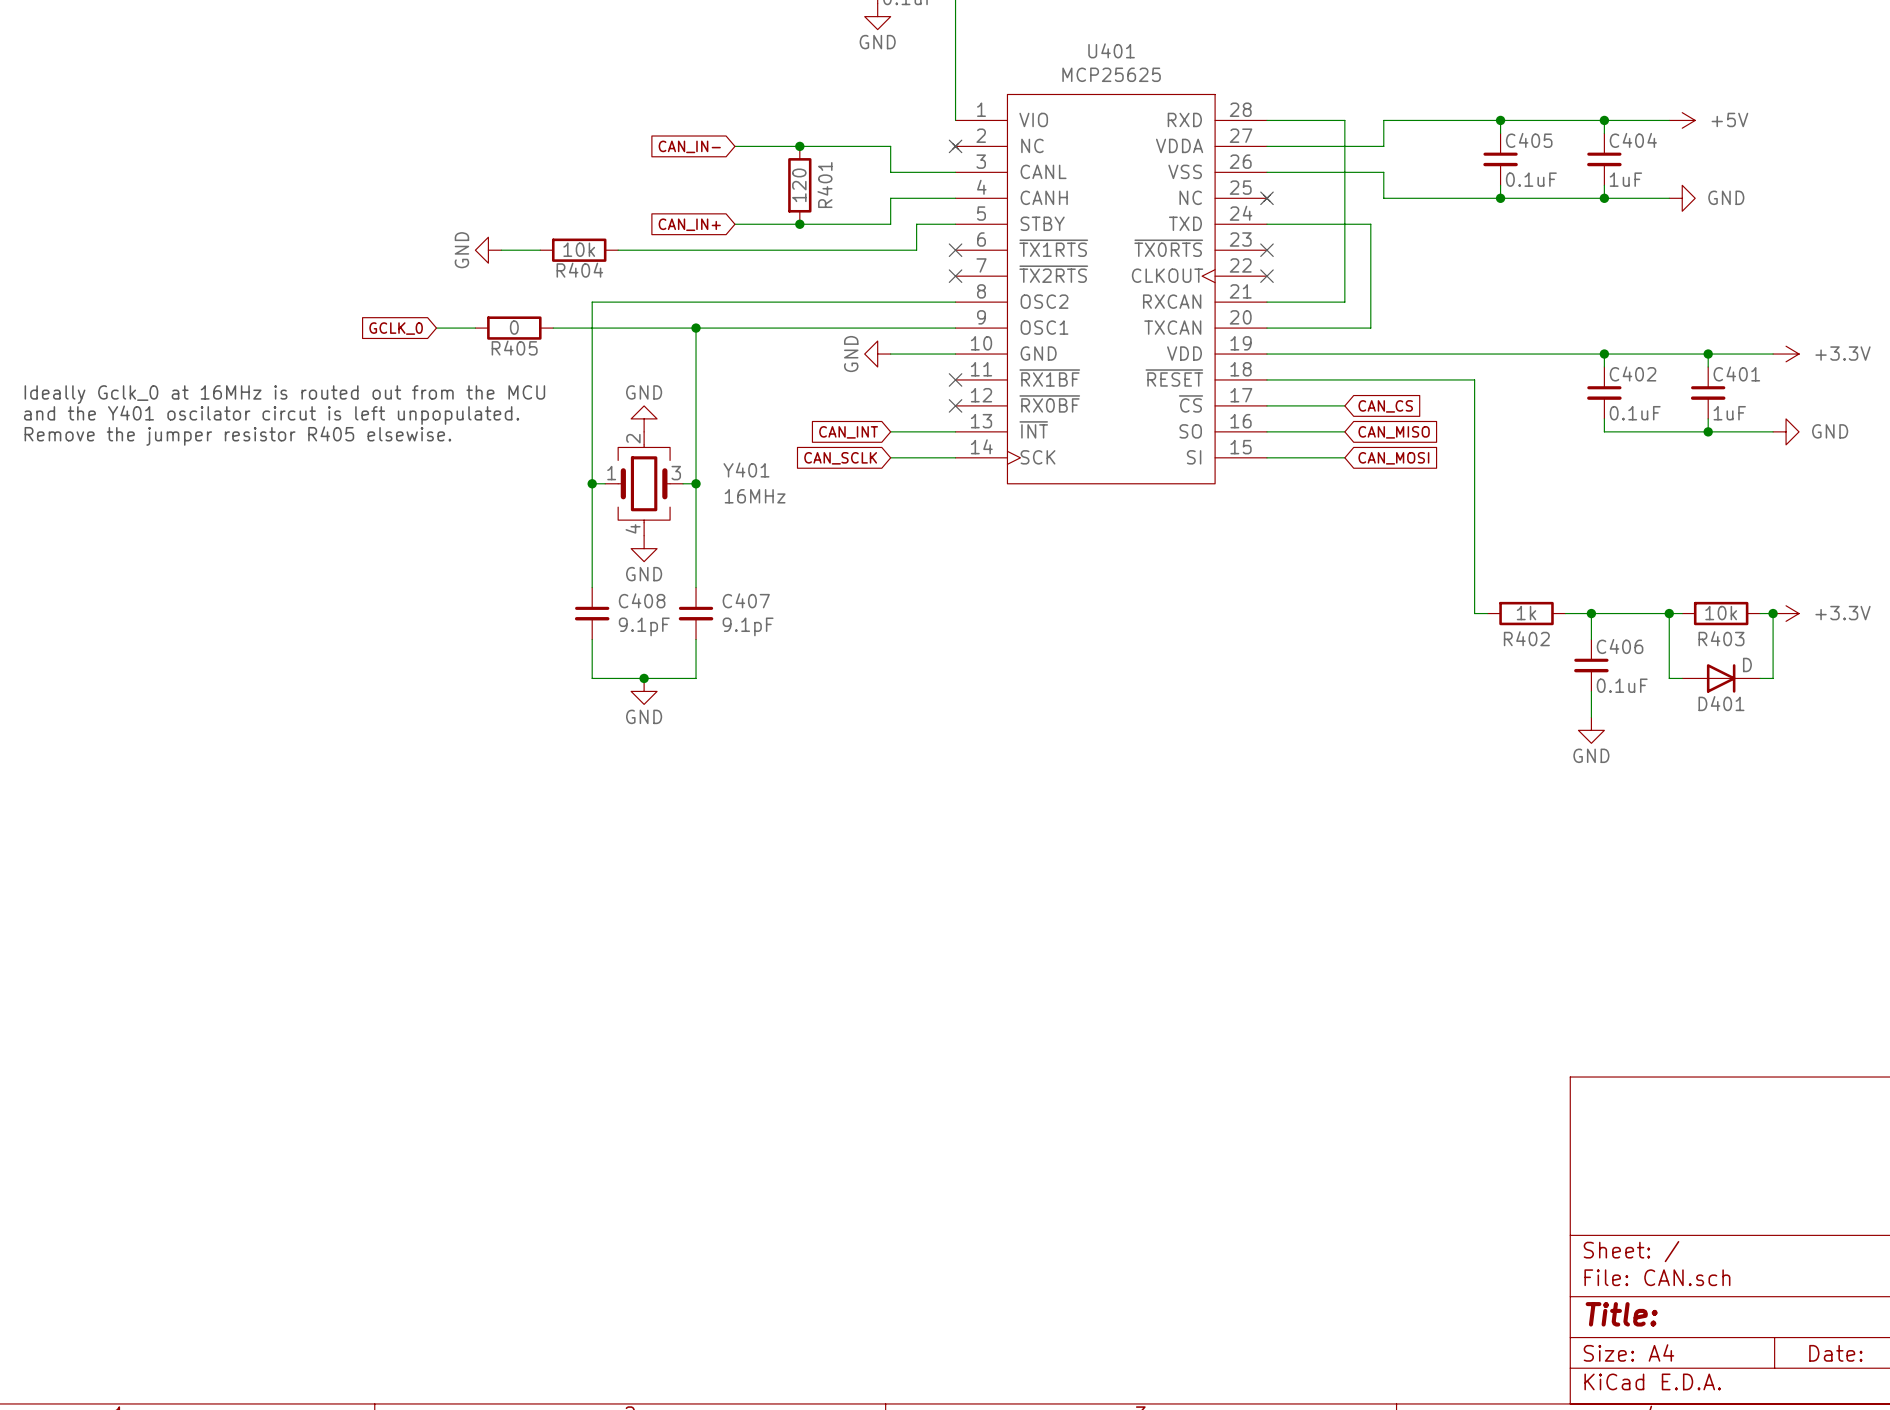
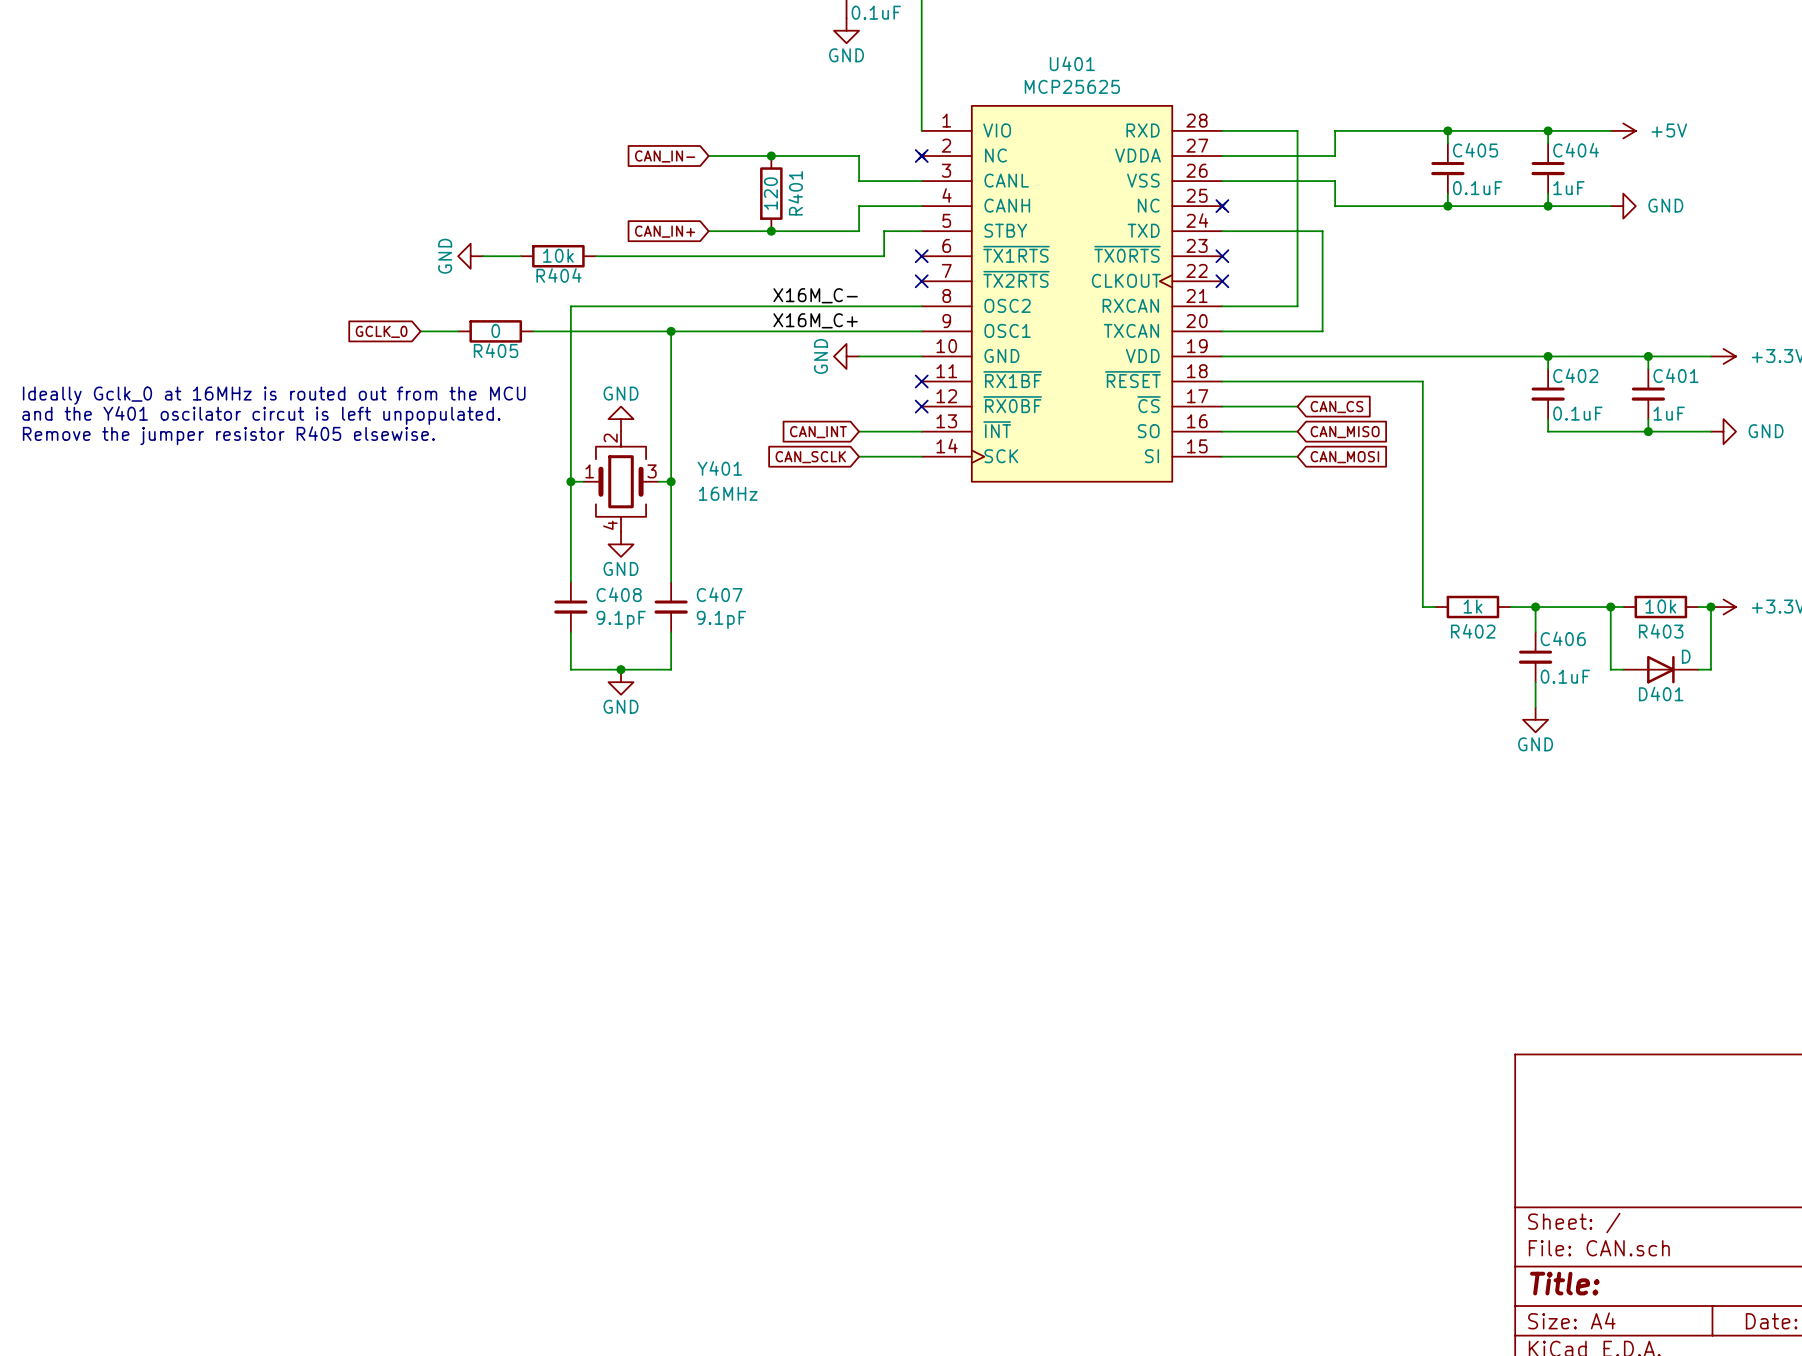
label: none -> X16M_C- (815, 295)
label: none -> X16M_C+ (815, 320)

